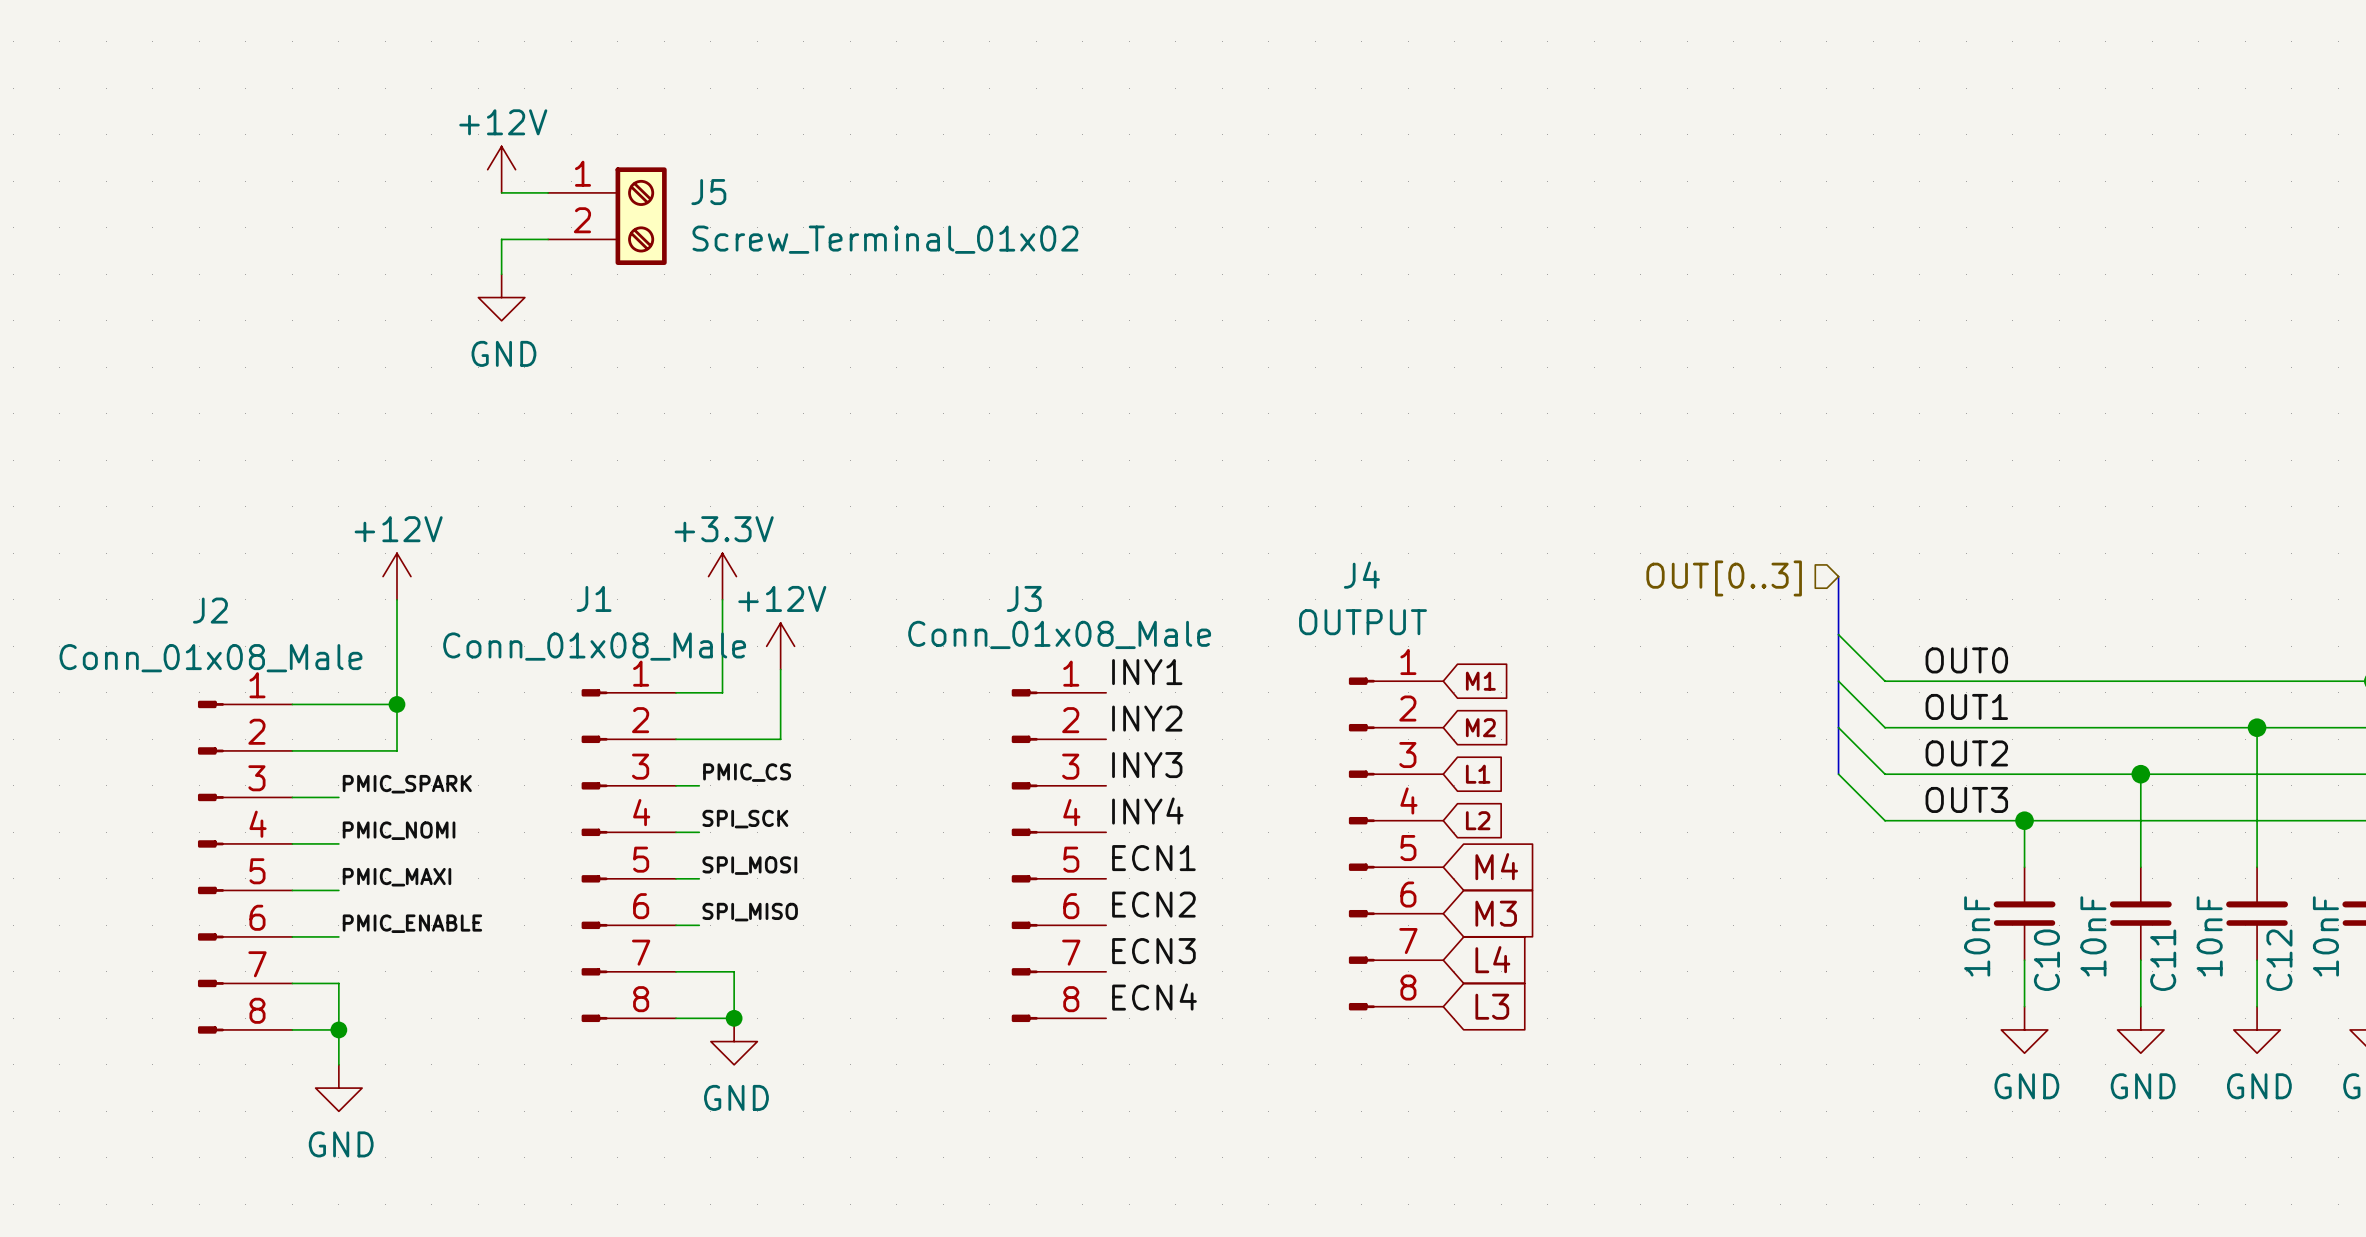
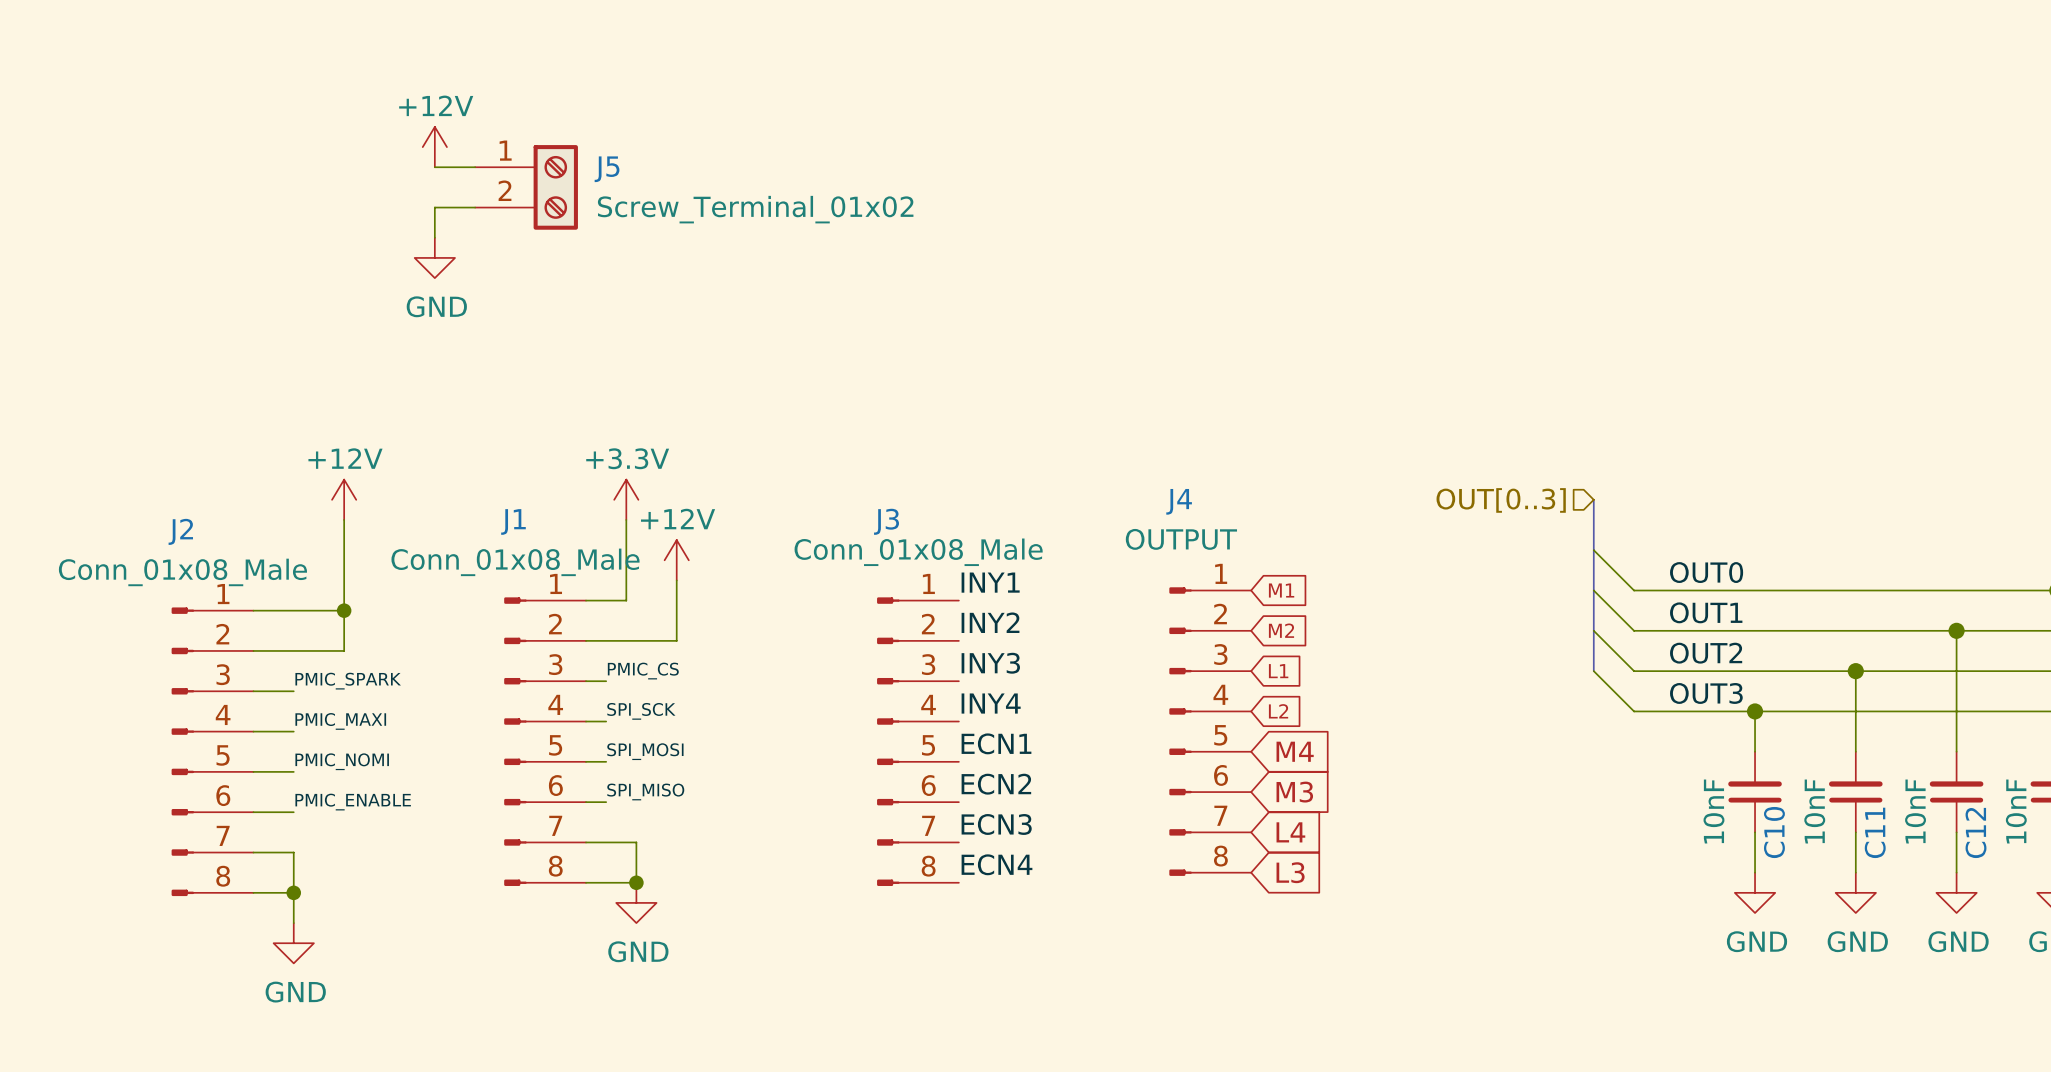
label: PMIC_NOMI (399, 830) -> PMIC_MAXI (340, 721)
label: PMIC_MAXI (396, 877) -> PMIC_NOMI (342, 761)

